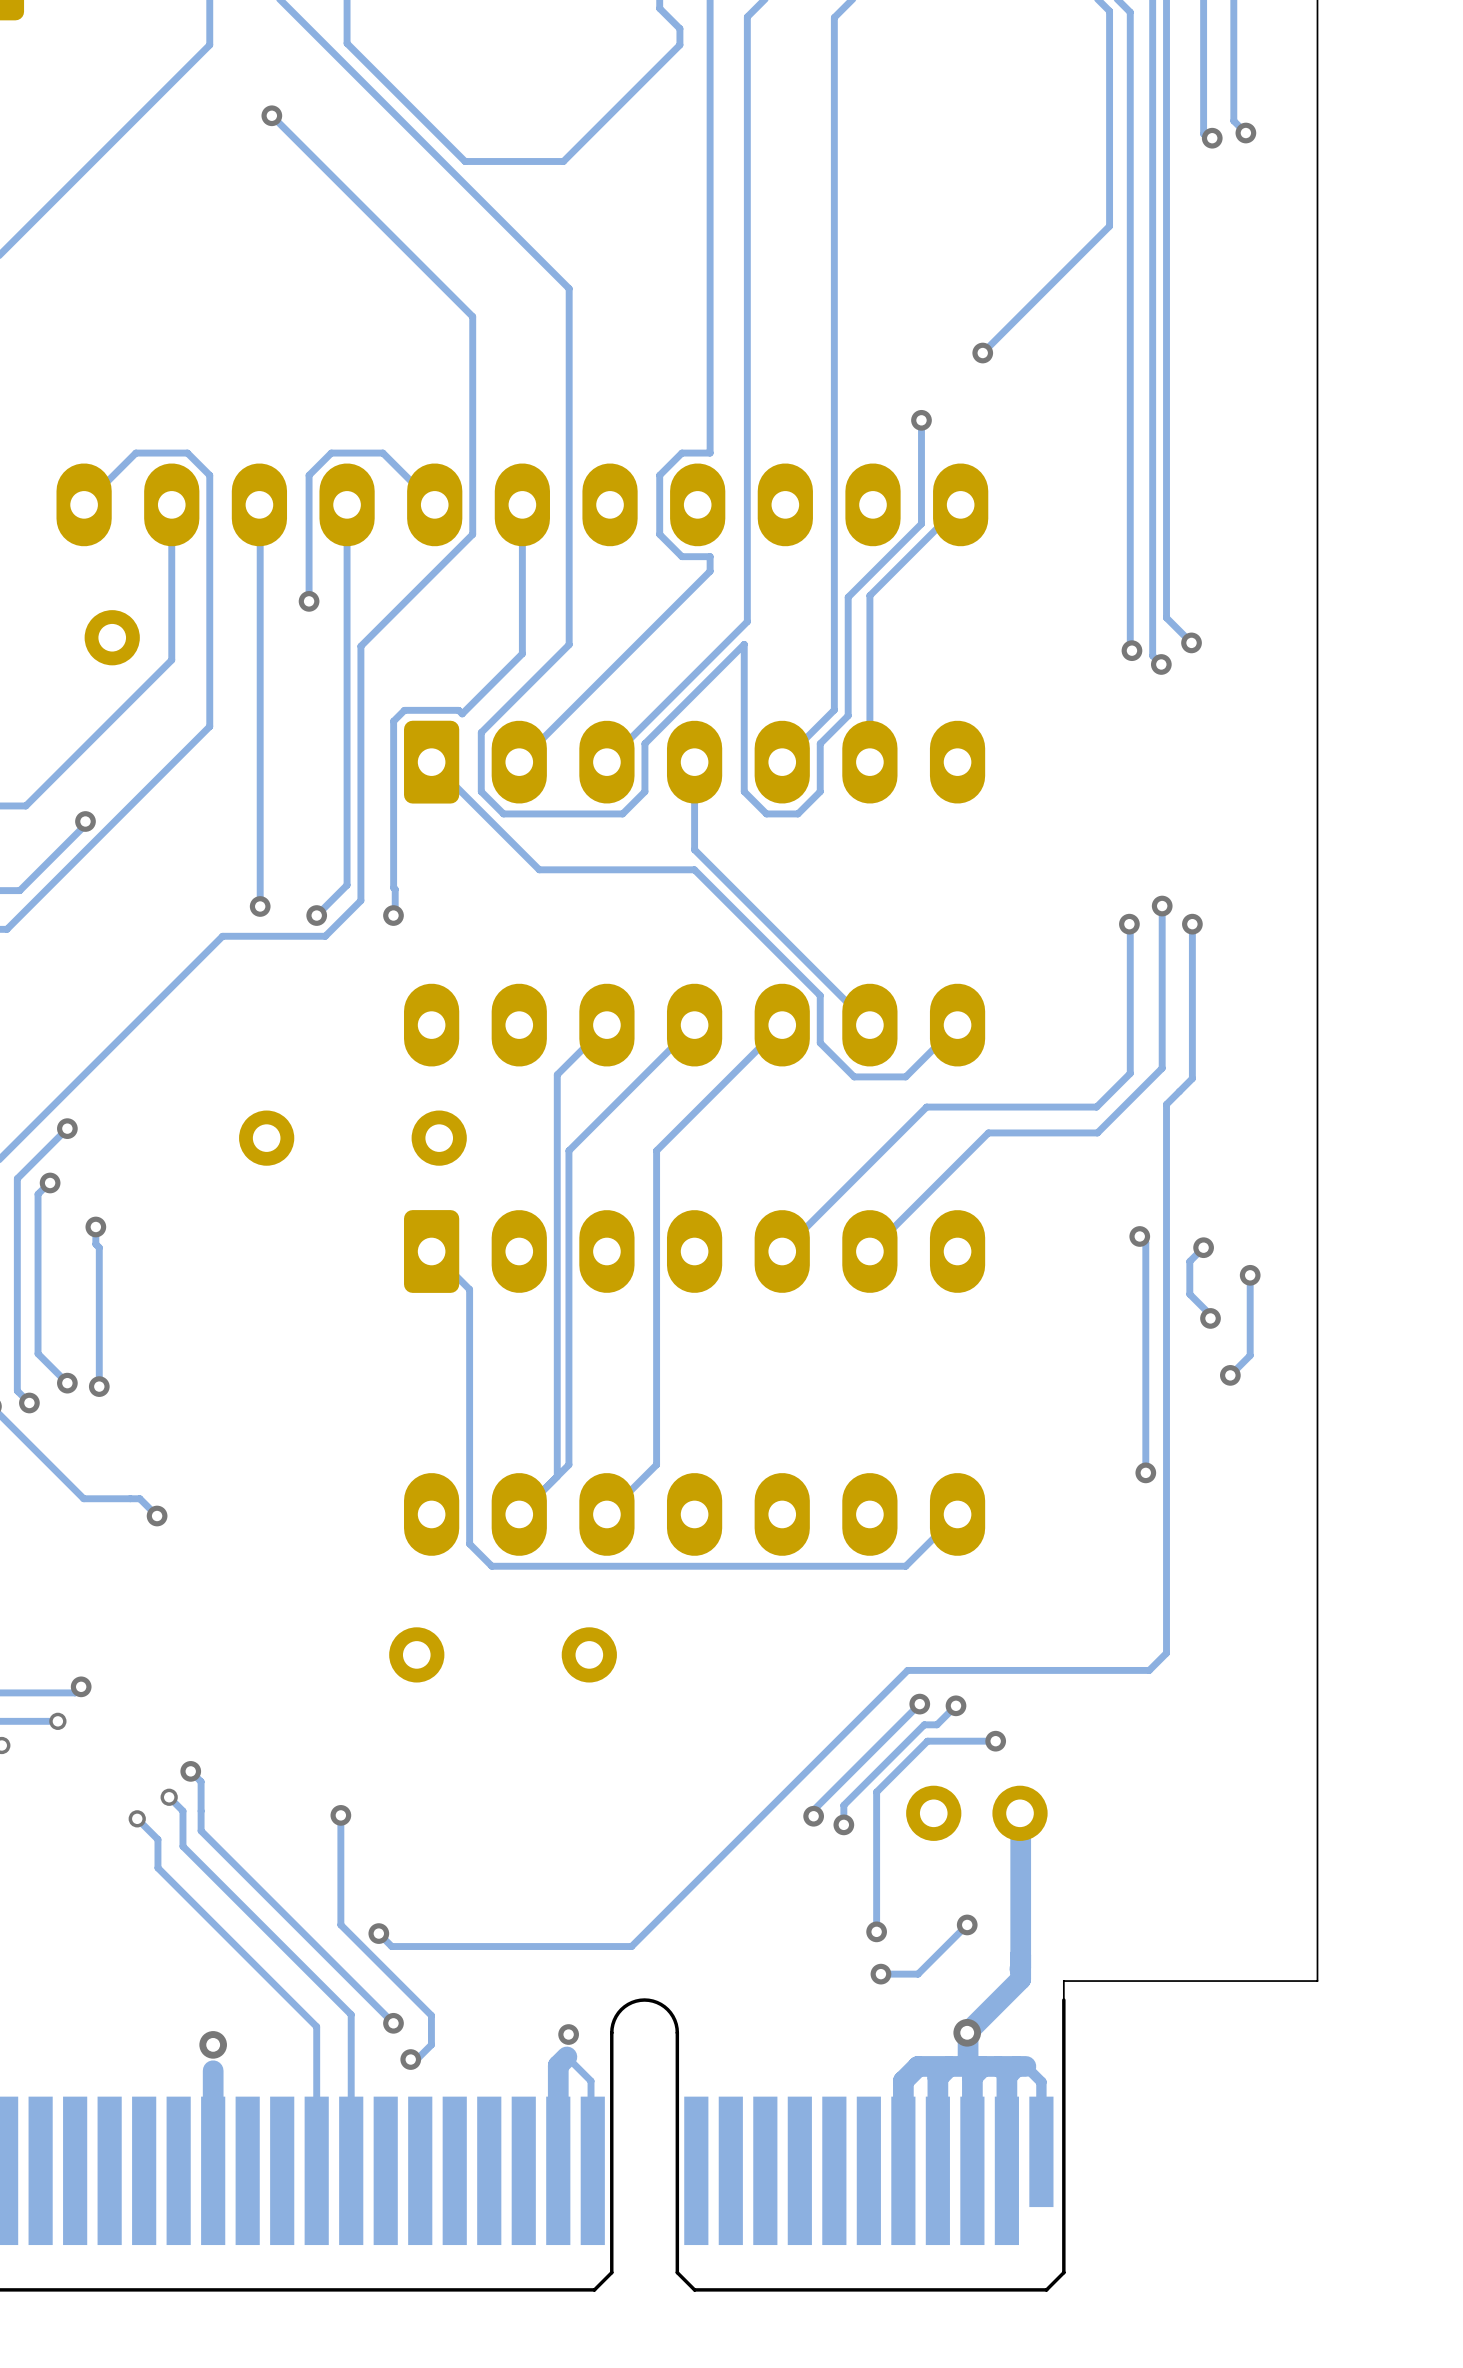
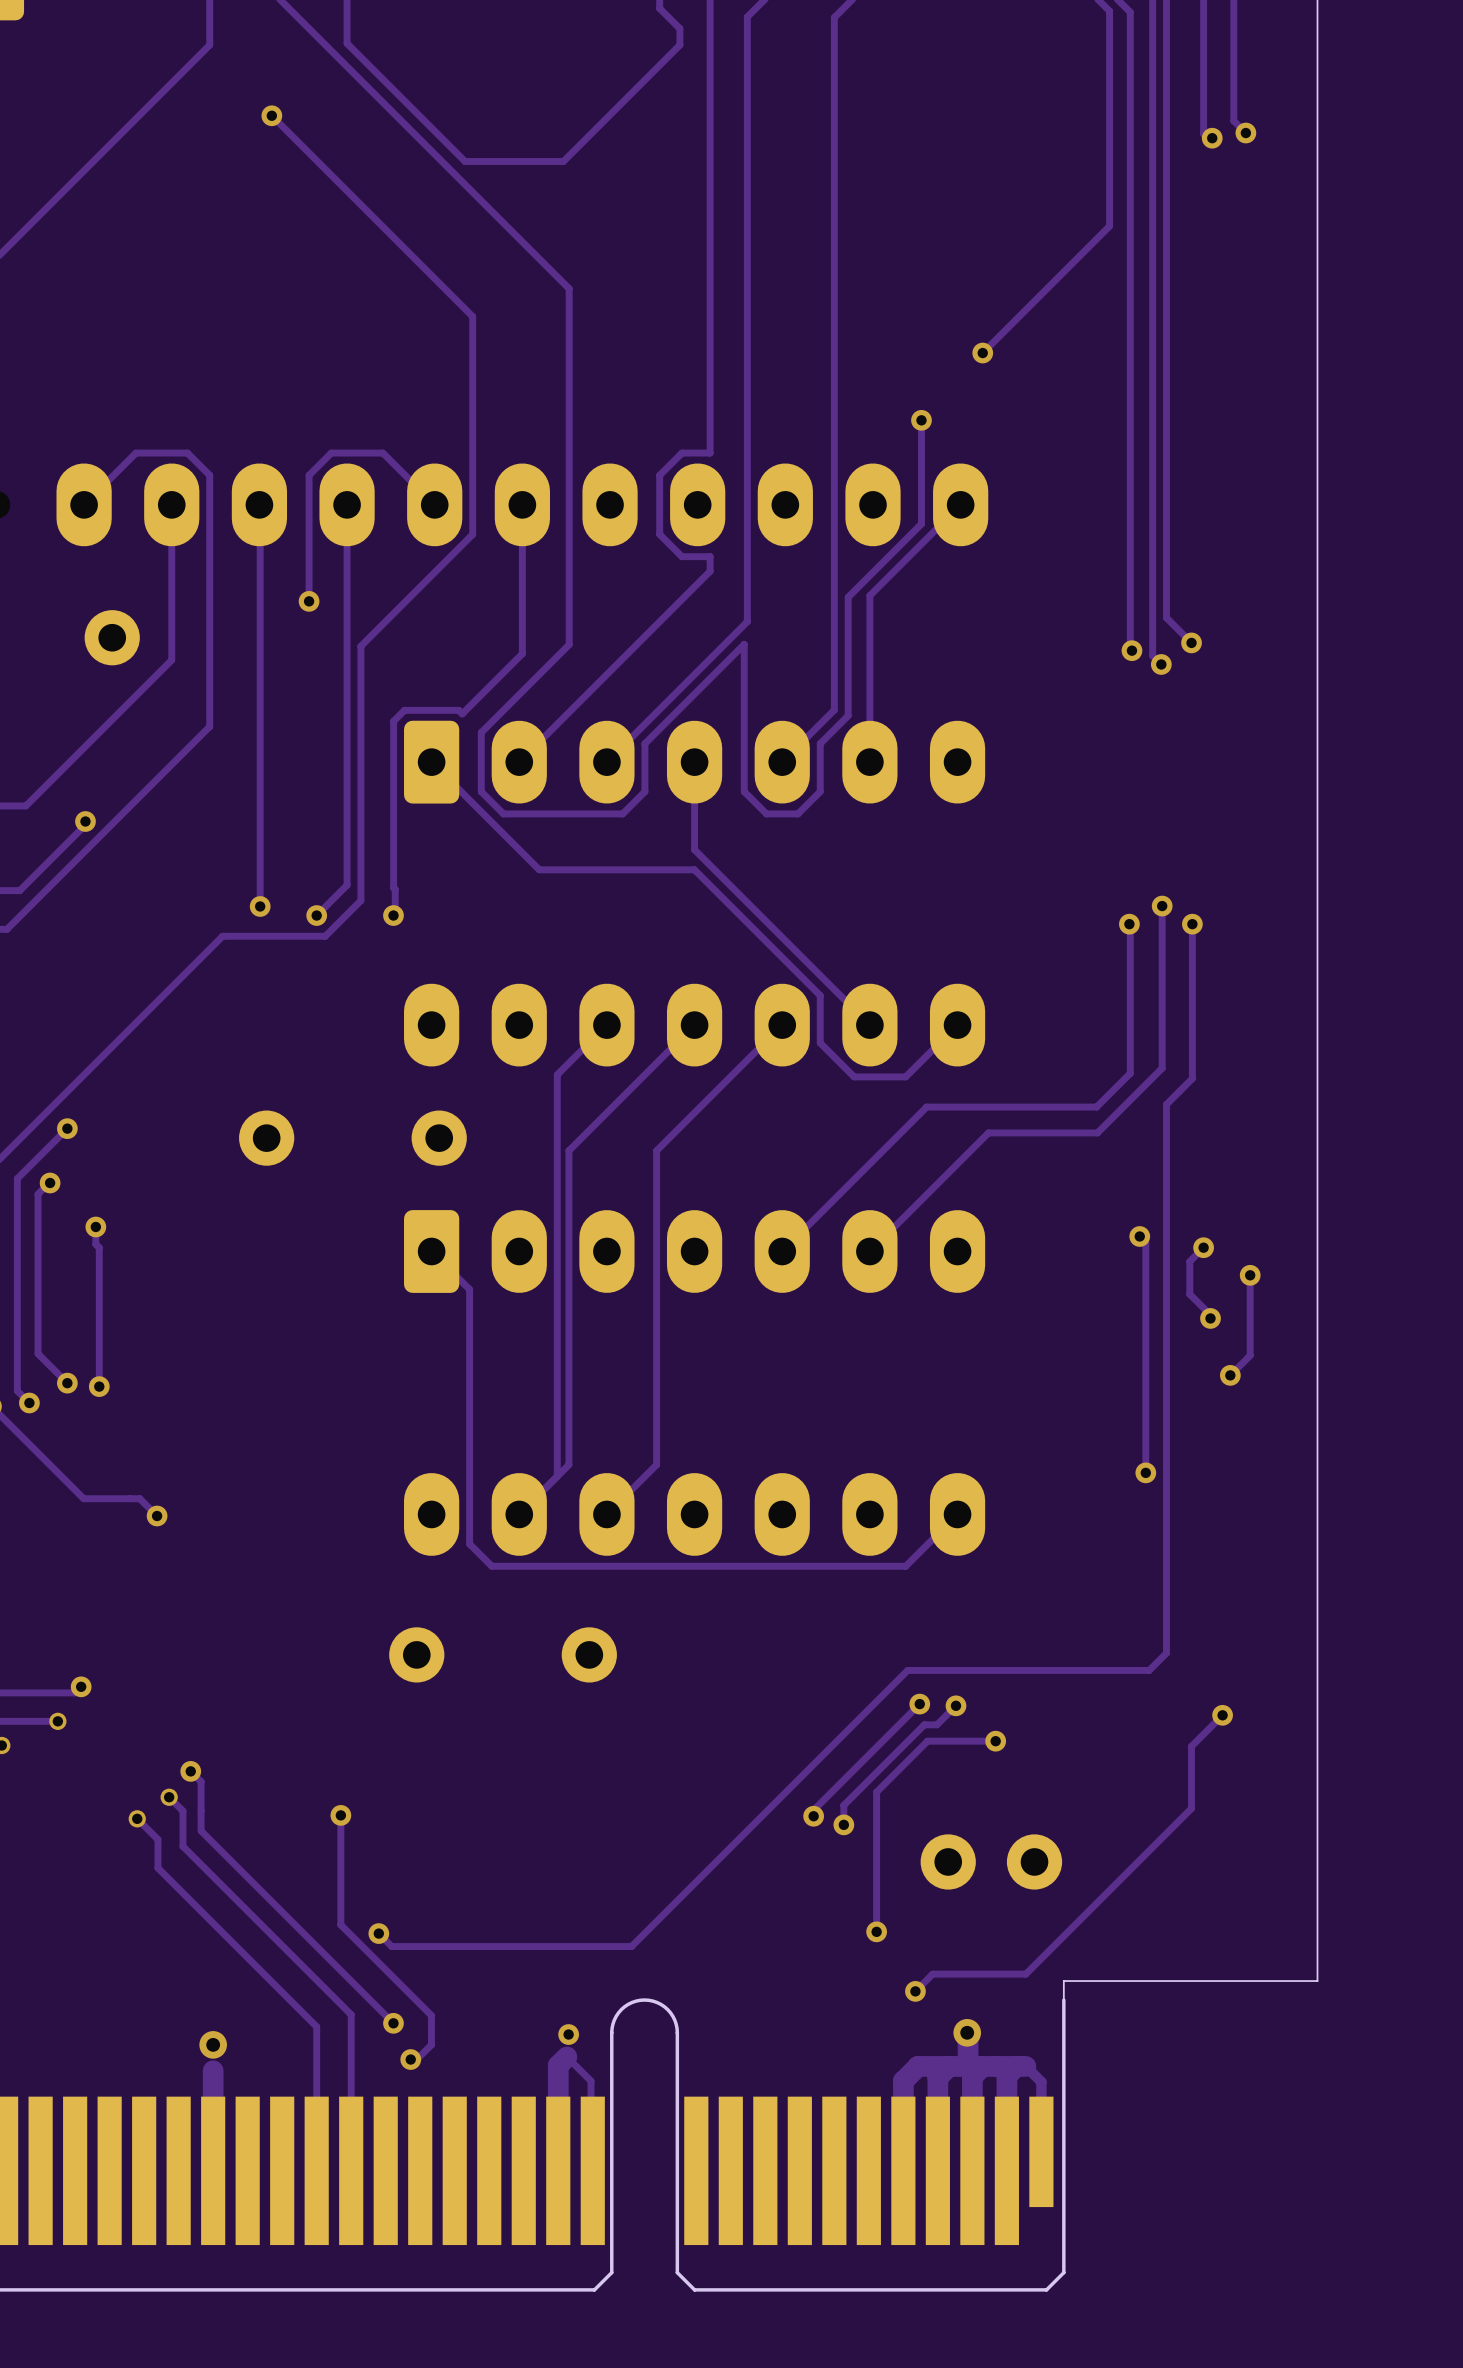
track: none -> (1222, 1715) (1191, 1746) (1191, 1808) (1025, 1974) (932, 1974) (915, 1991)
via: none -> (1222, 1715)
track: (1020, 1808) (1020, 1979) (967, 2032) -> none
part position: (976, 1813) -> (991, 1861)
track: (967, 1924) (918, 1974) (880, 1974) -> none
via: (967, 1924) -> none
via position: (880, 1974) -> (915, 1991)

